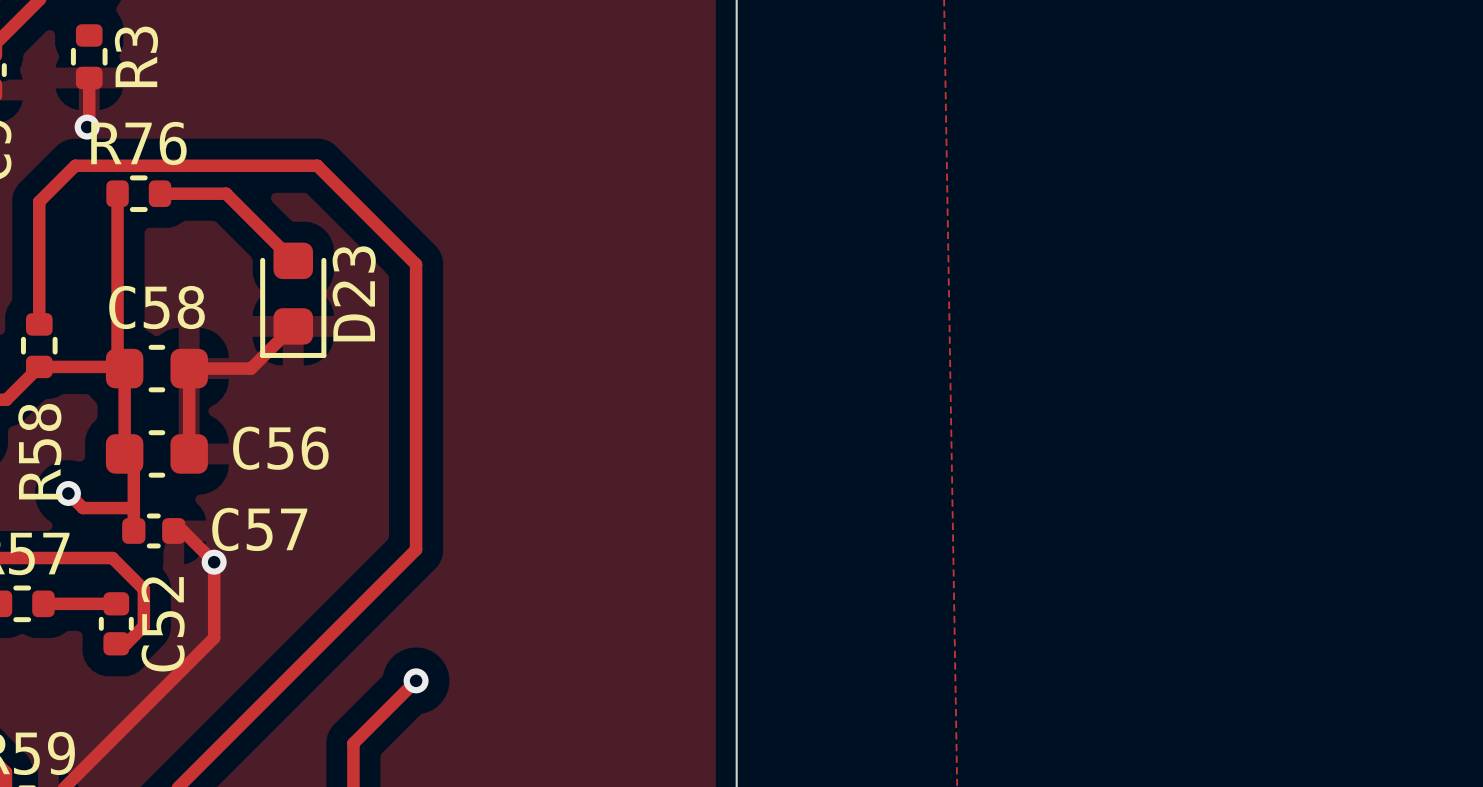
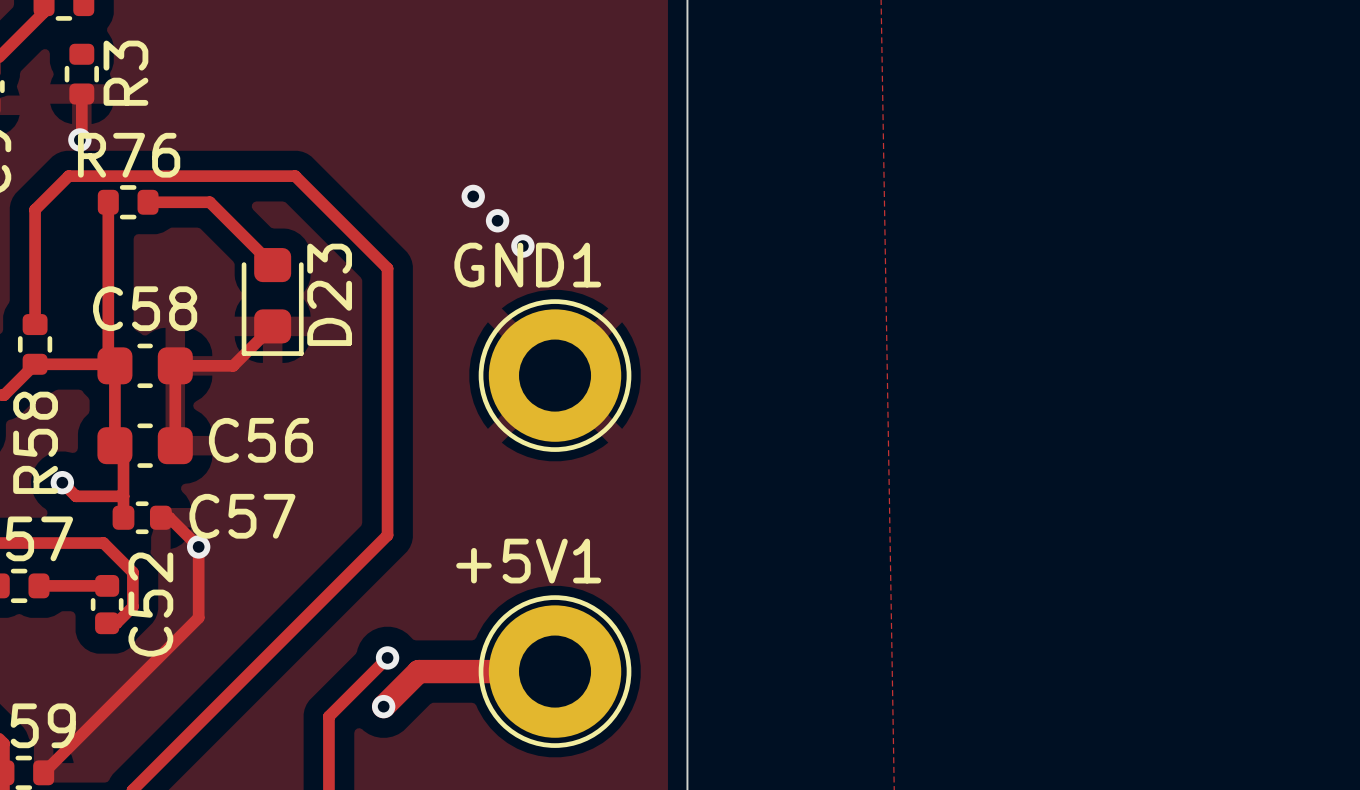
via: none -> (473, 196)
via: none -> (497, 220)
via: none -> (522, 246)
GND1: none -> (555, 375)
track: none -> (555, 671) (418, 671) (383, 706)
+5V1: none -> (555, 671)
via: none -> (383, 706)

